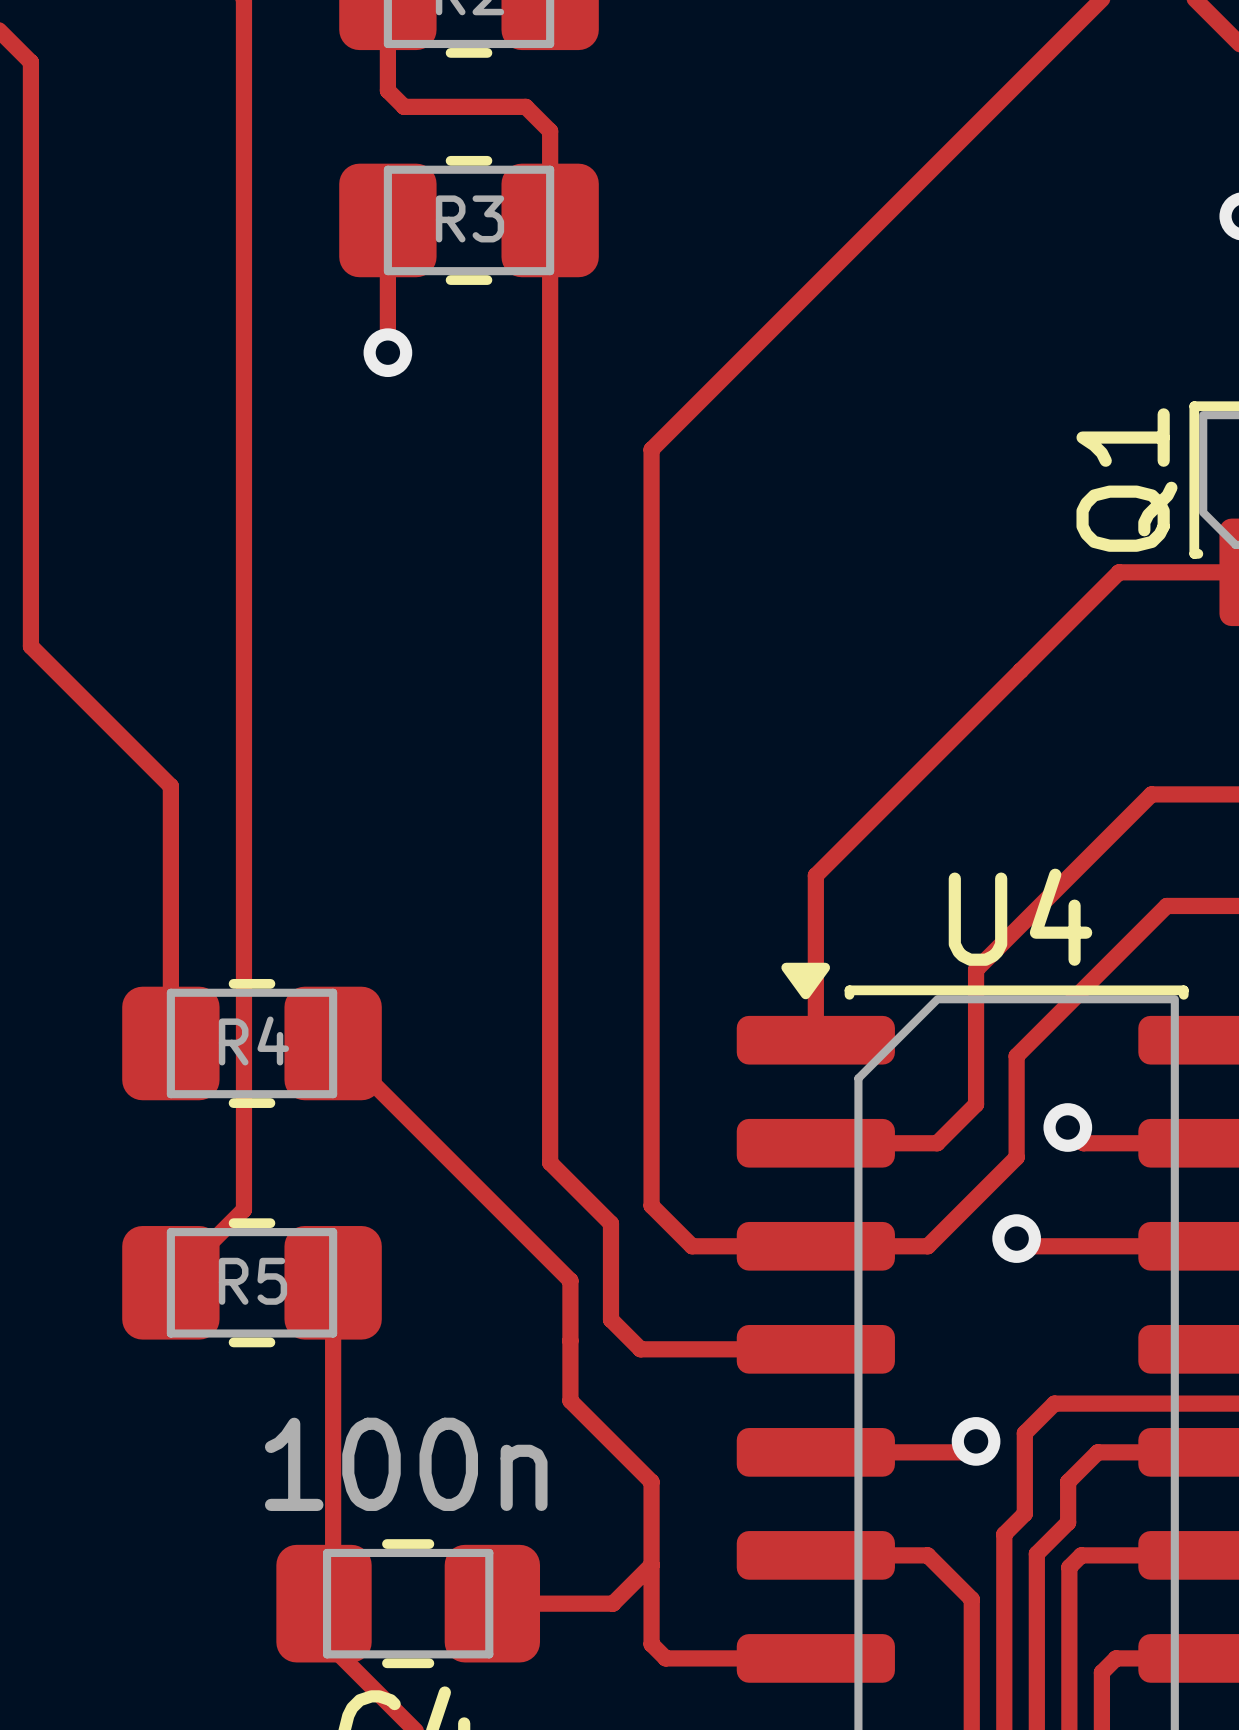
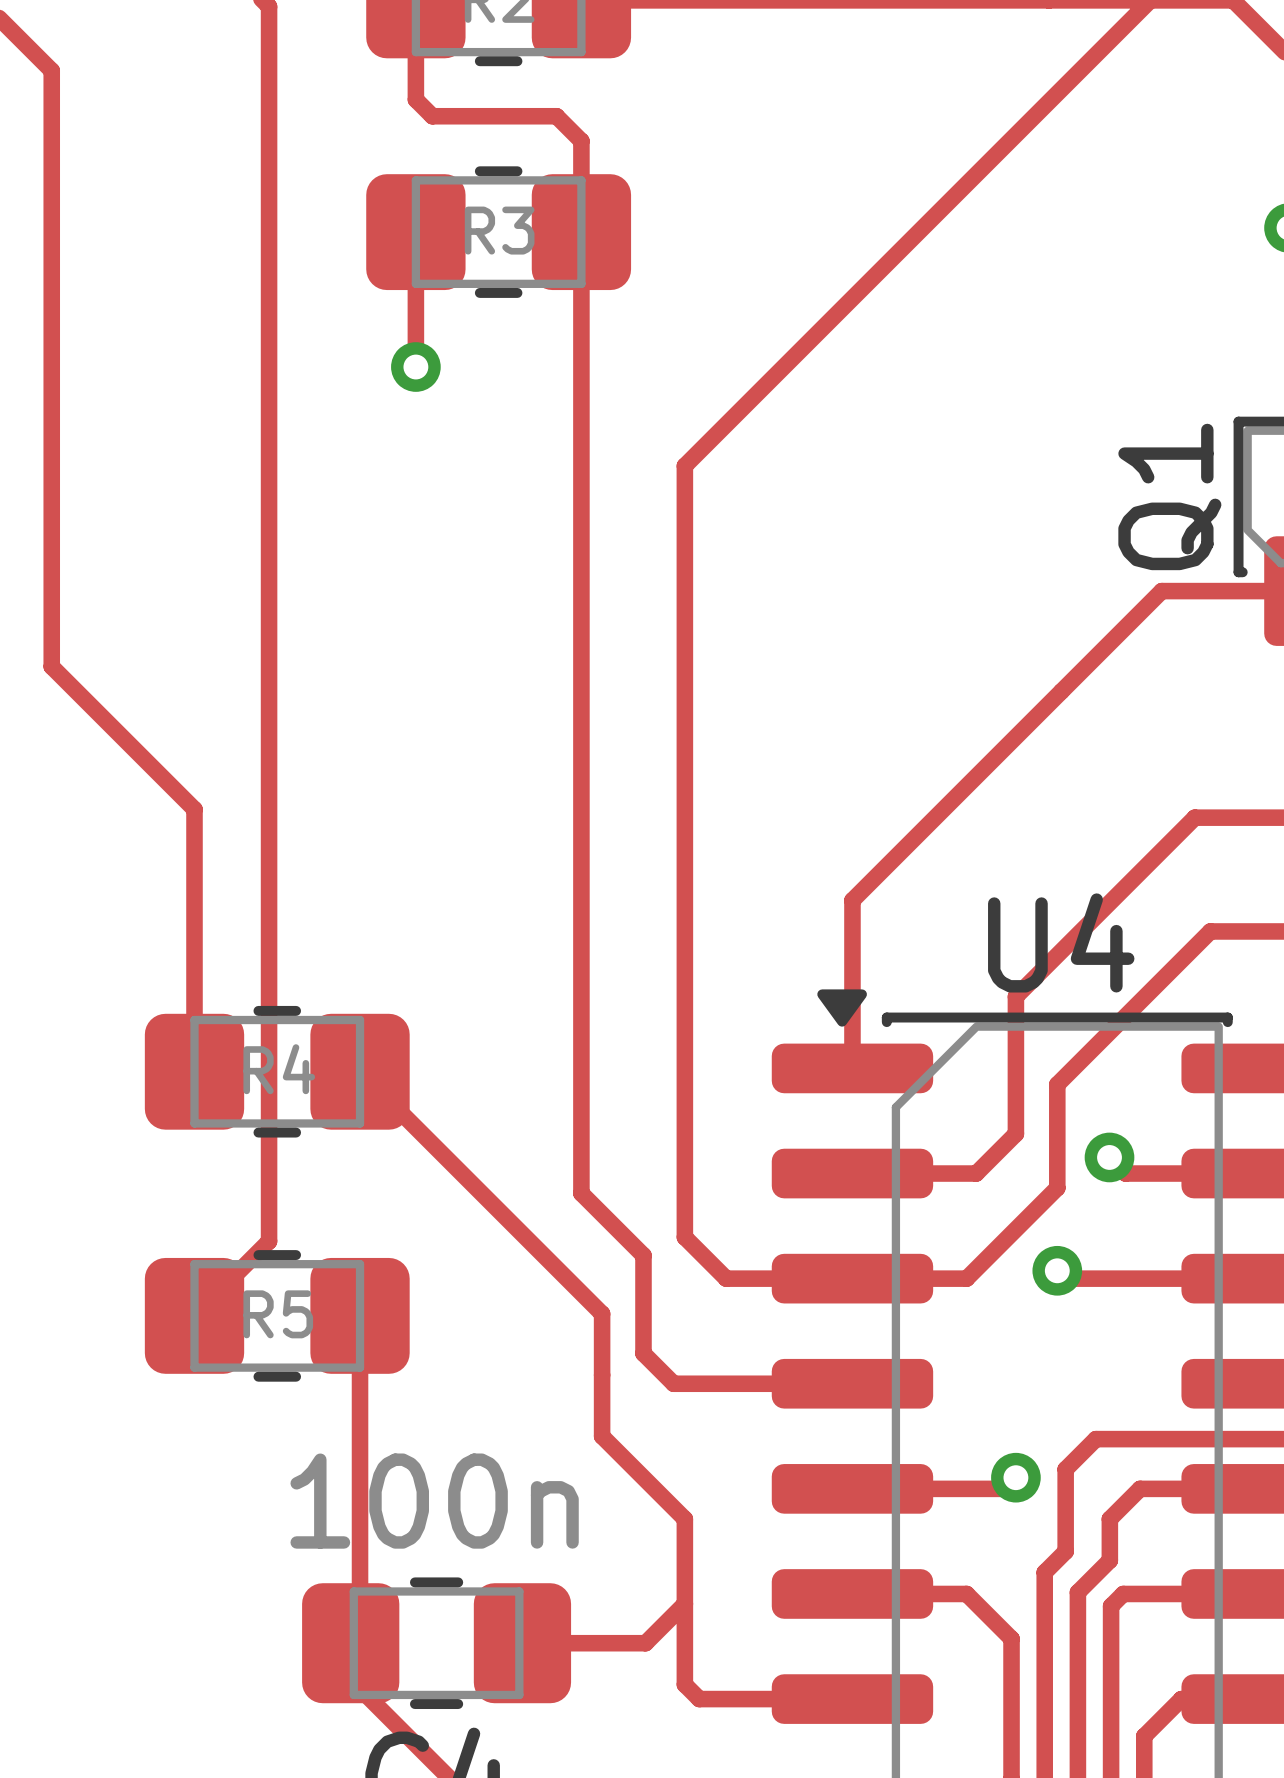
top track: (1138, 1658) (1116, 1658) (1101, 1672) (1101, 1694) -> (1181, 1699) (1144, 1736)

